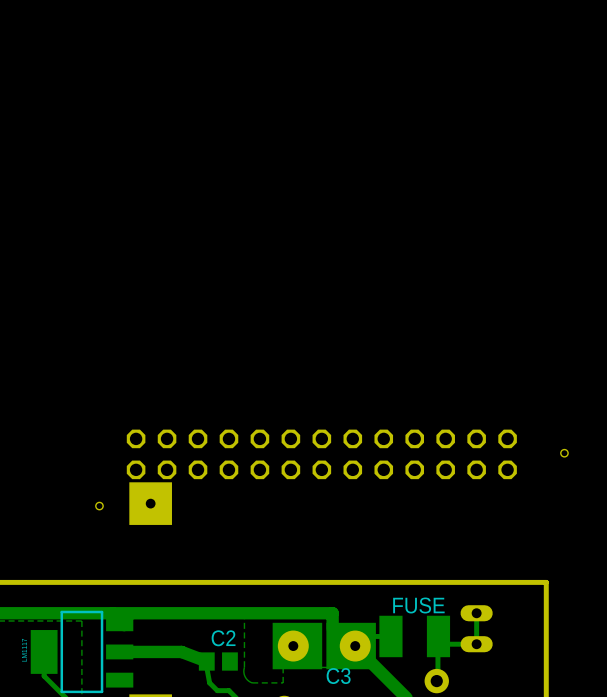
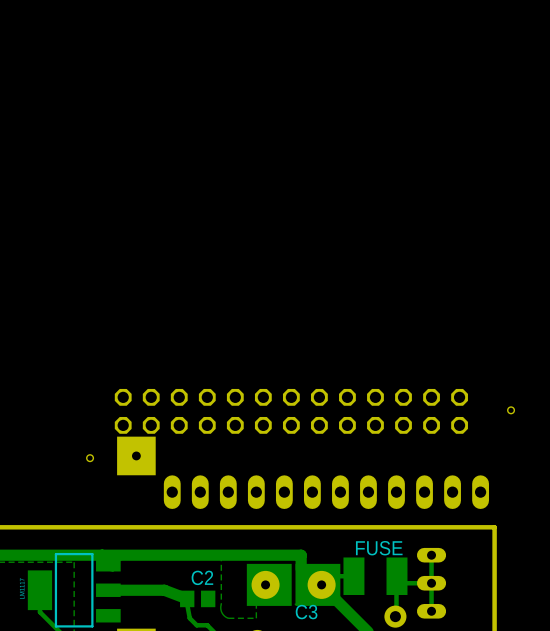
part: none -> (326, 492)
track: none -> (431, 583) (431, 611)
part: none -> (431, 611)

